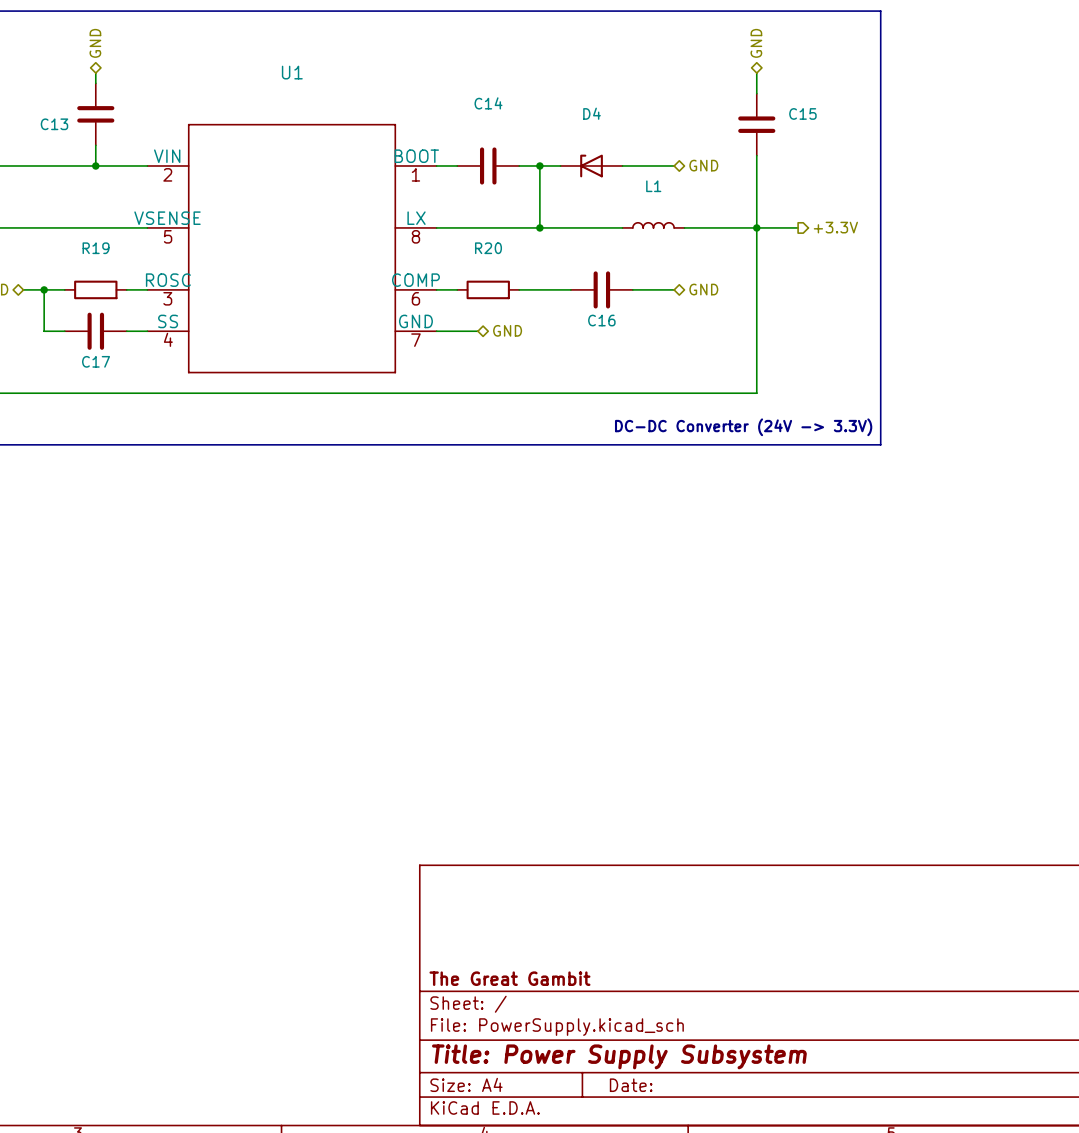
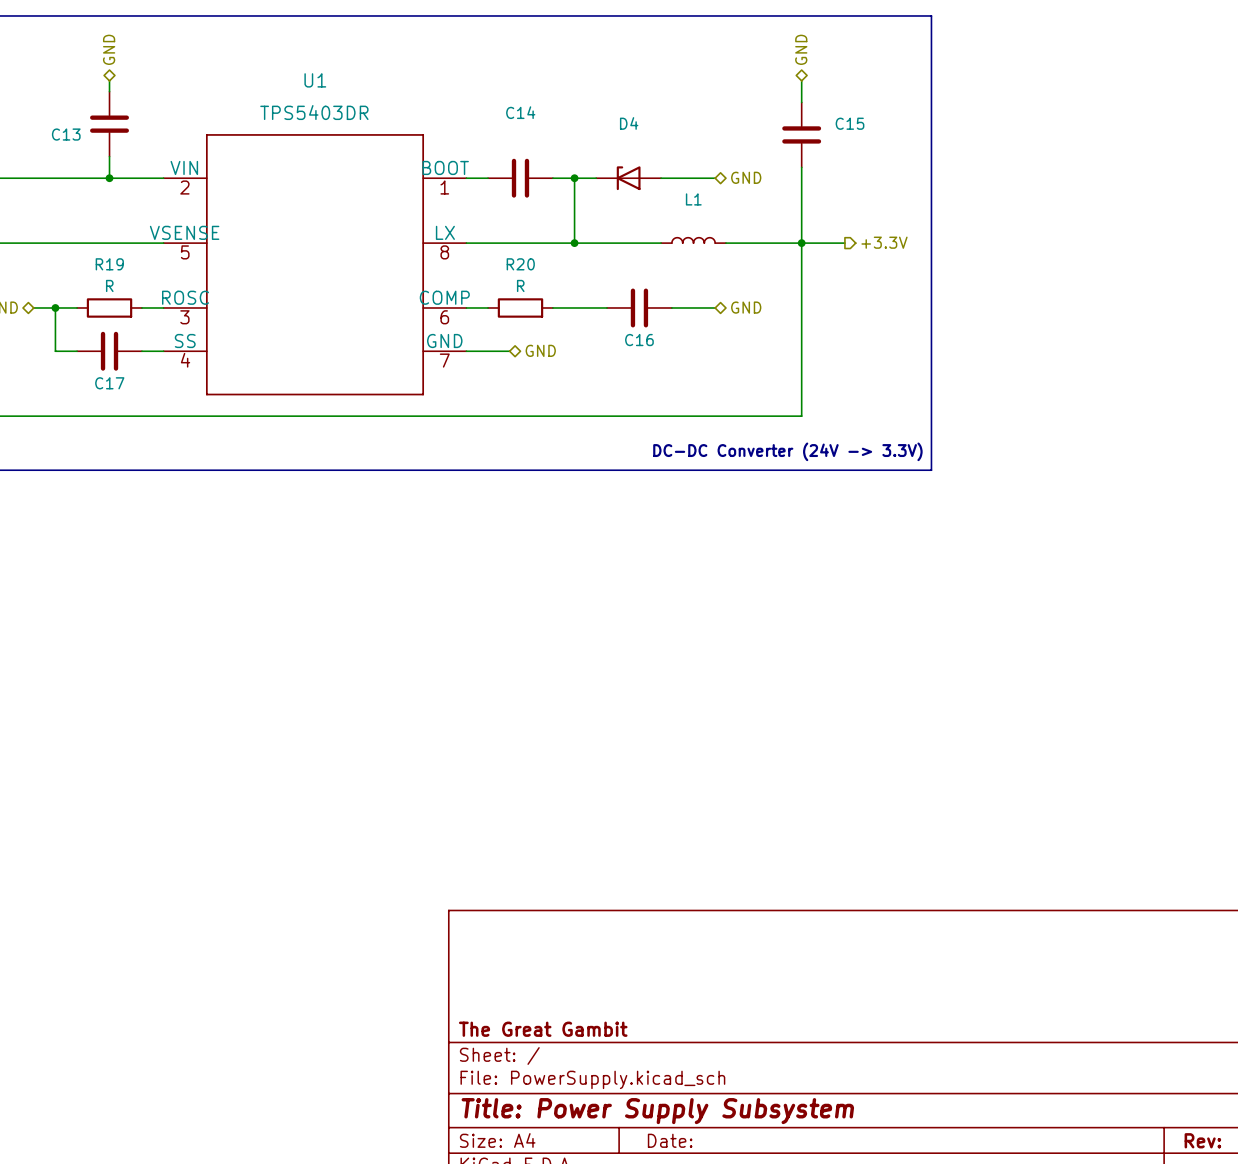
U1 value: none -> TPS5403DR (314, 112)
R19 value: none -> R (109, 285)
R20 value: none -> R (520, 285)

